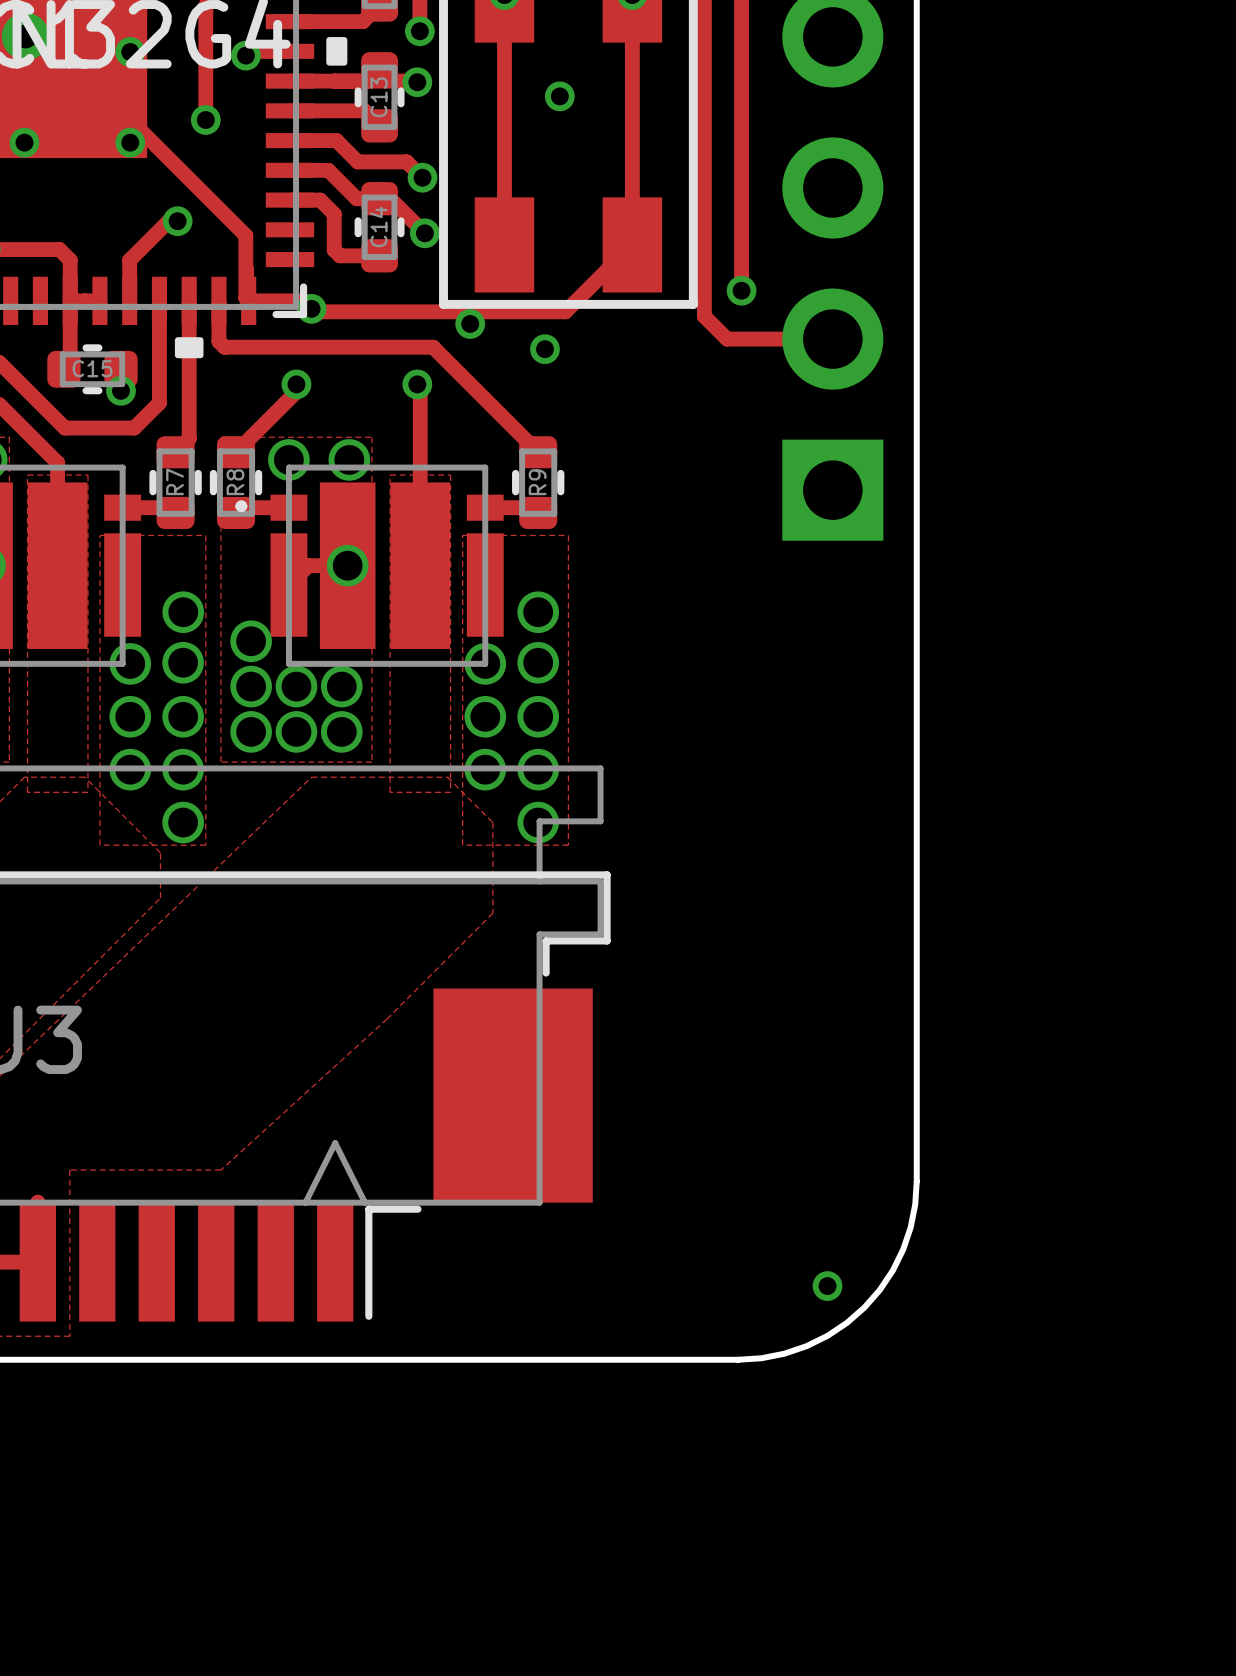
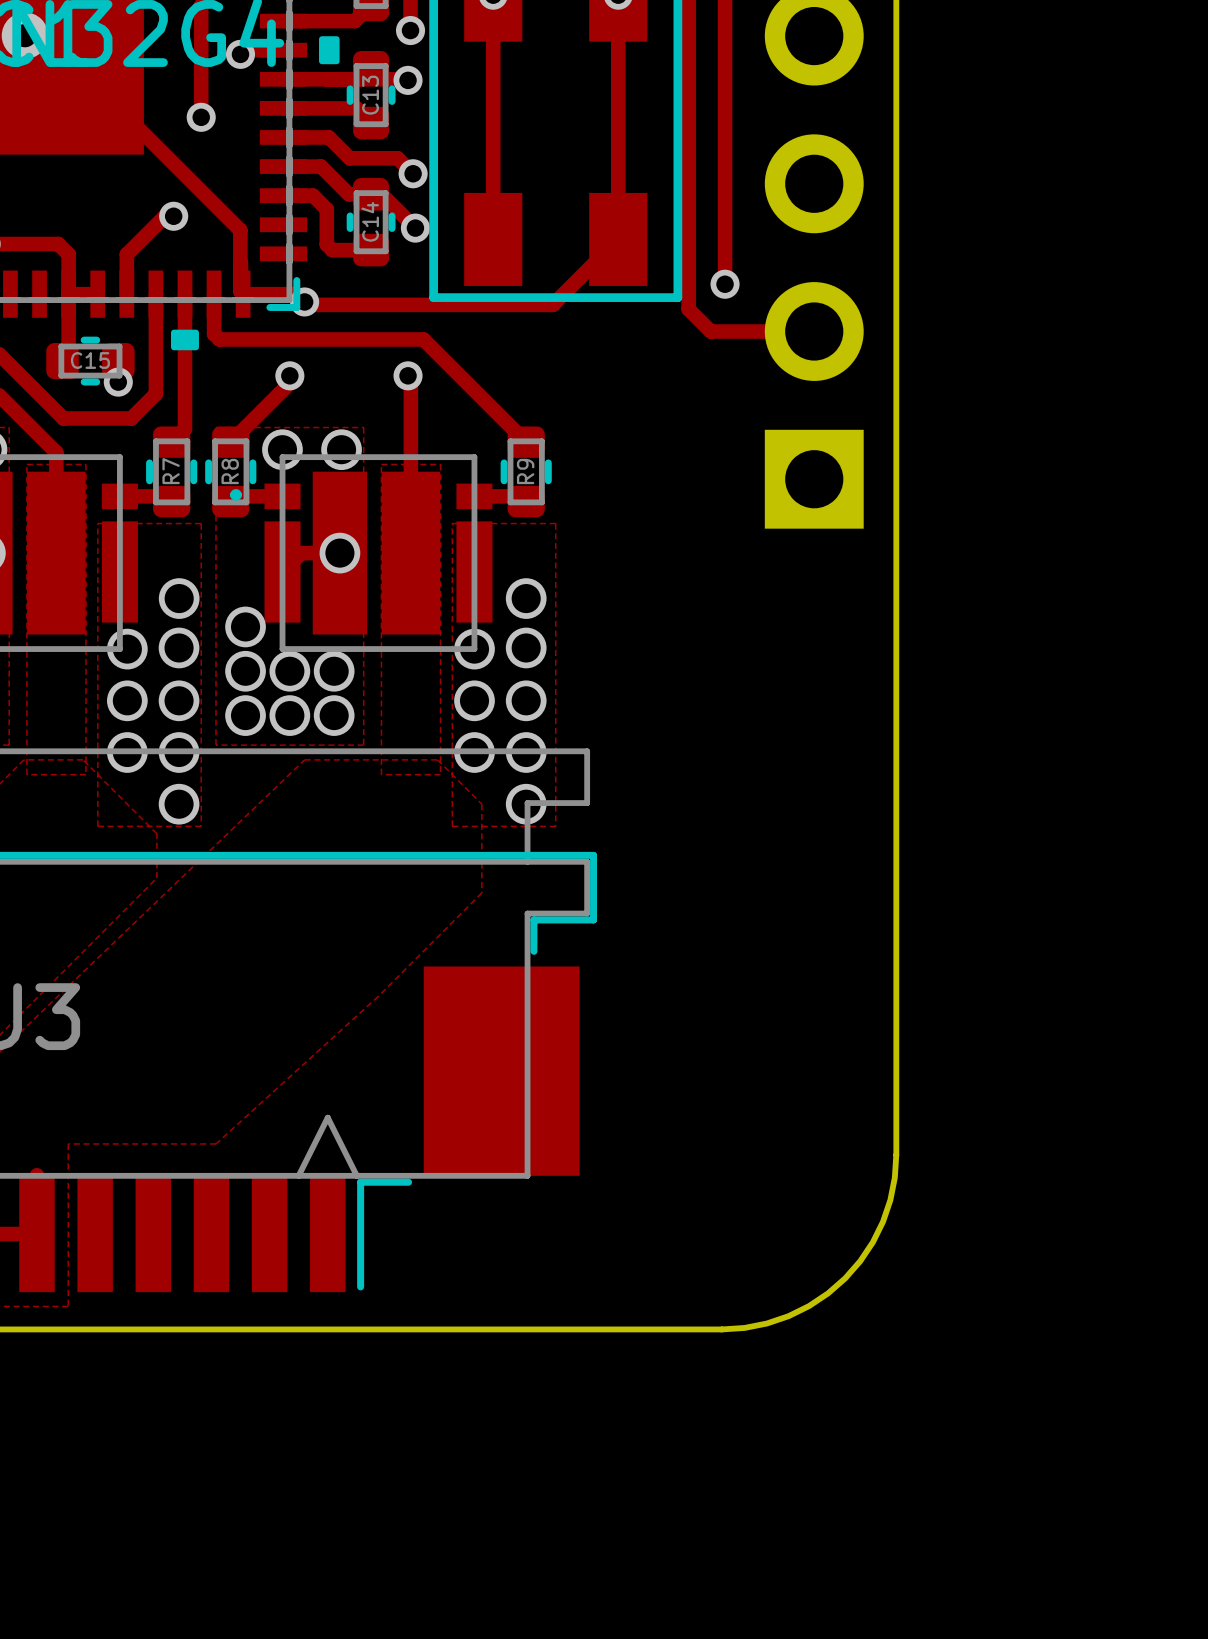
via: (130, 52) -> none
via: (559, 96) -> none
via: (24, 142) -> none
via: (130, 142) -> none
via: (470, 323) -> none
via: (544, 349) -> none
via: (827, 1286) -> none

